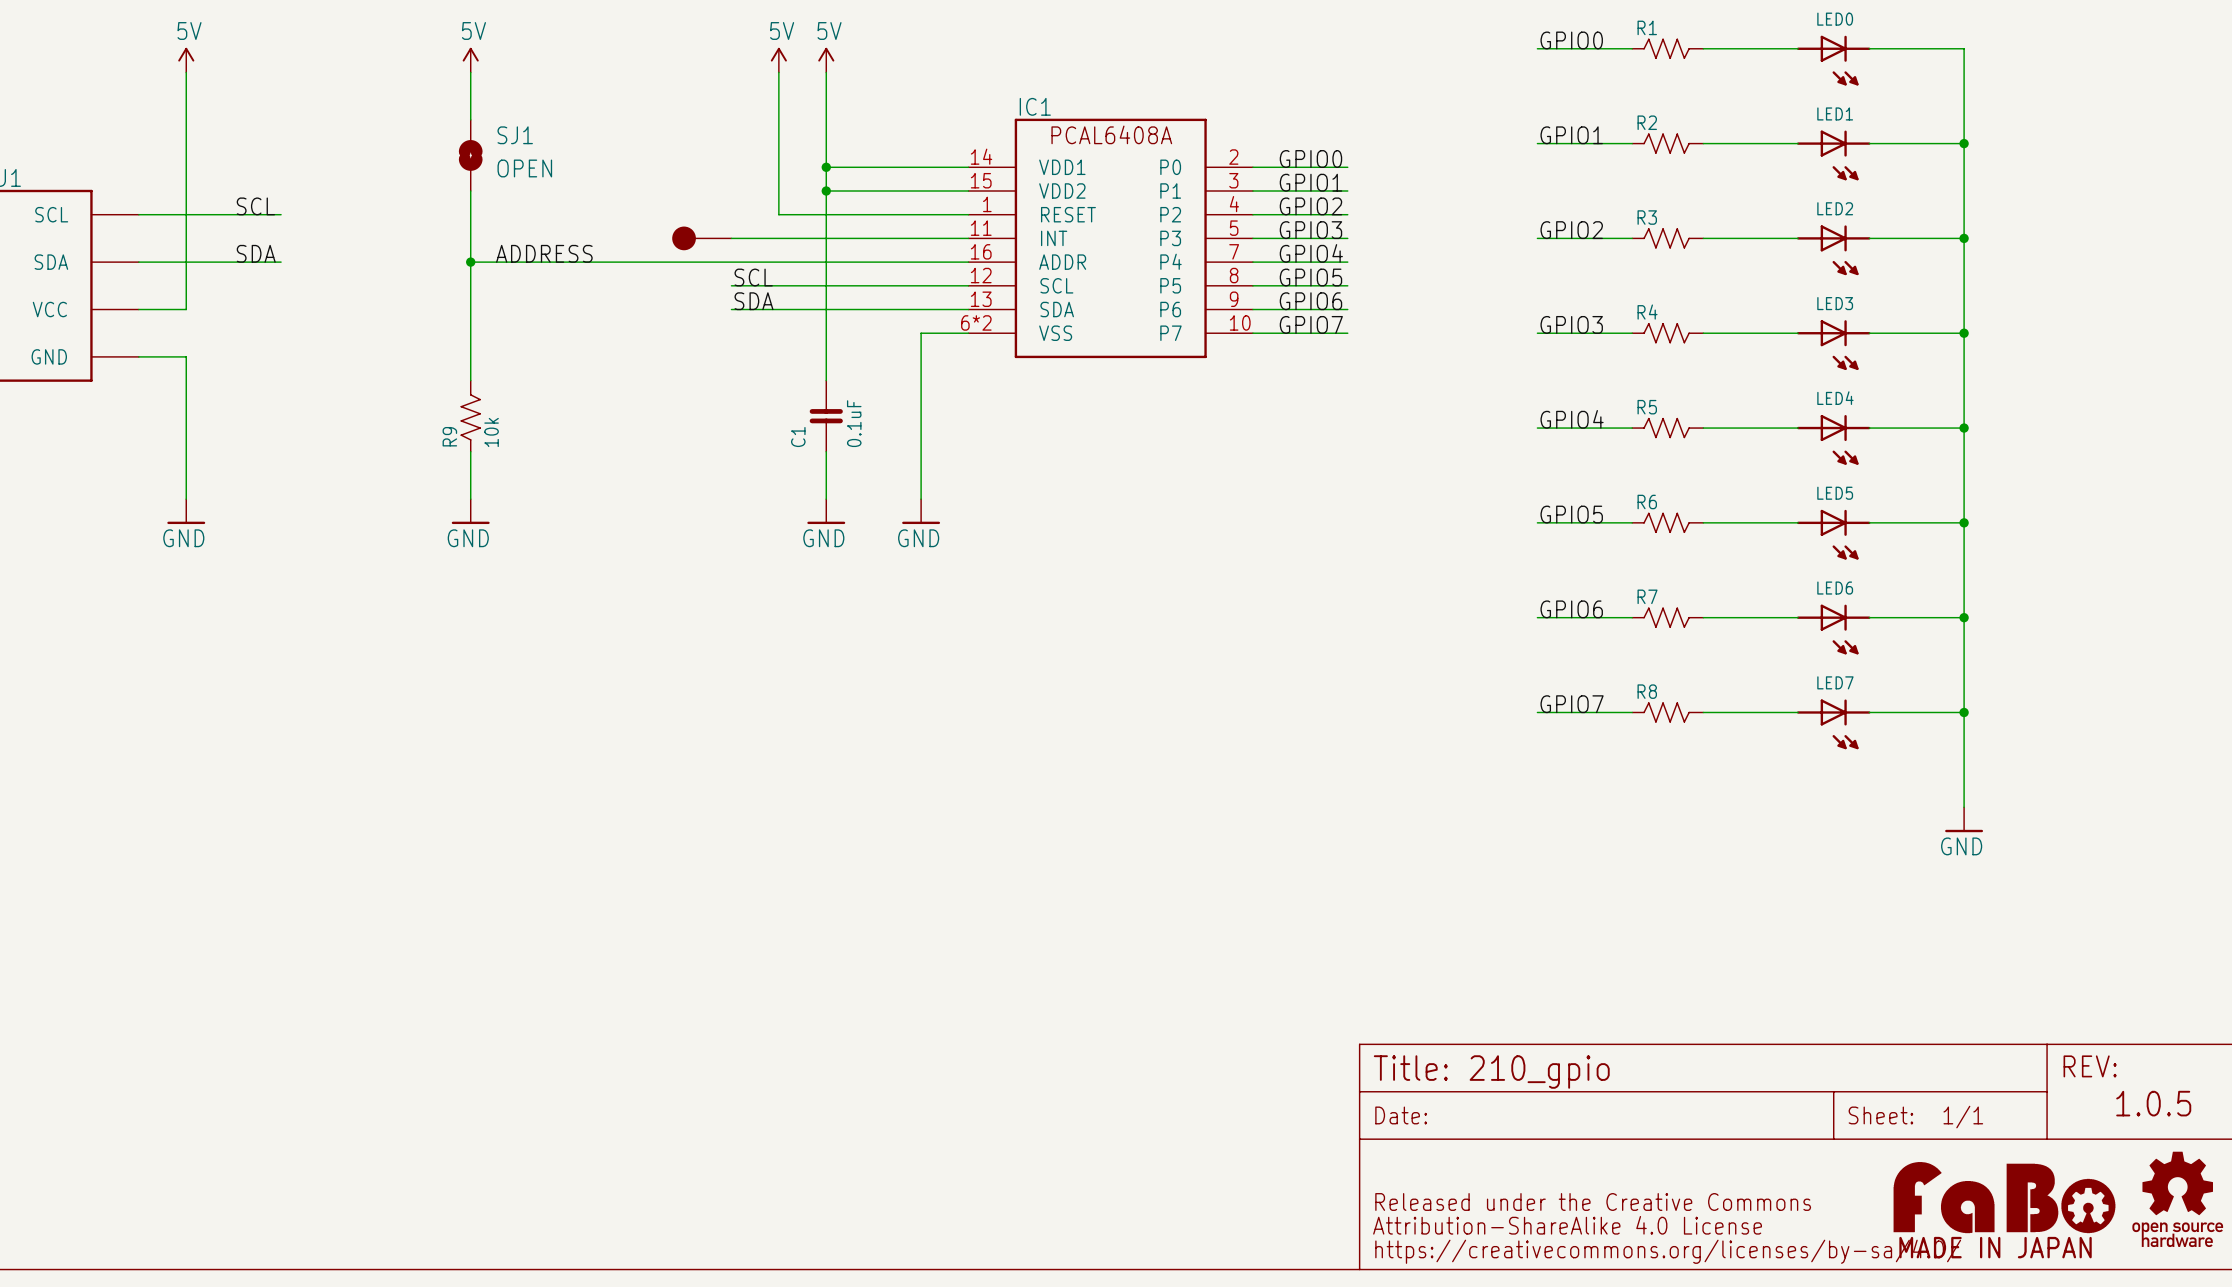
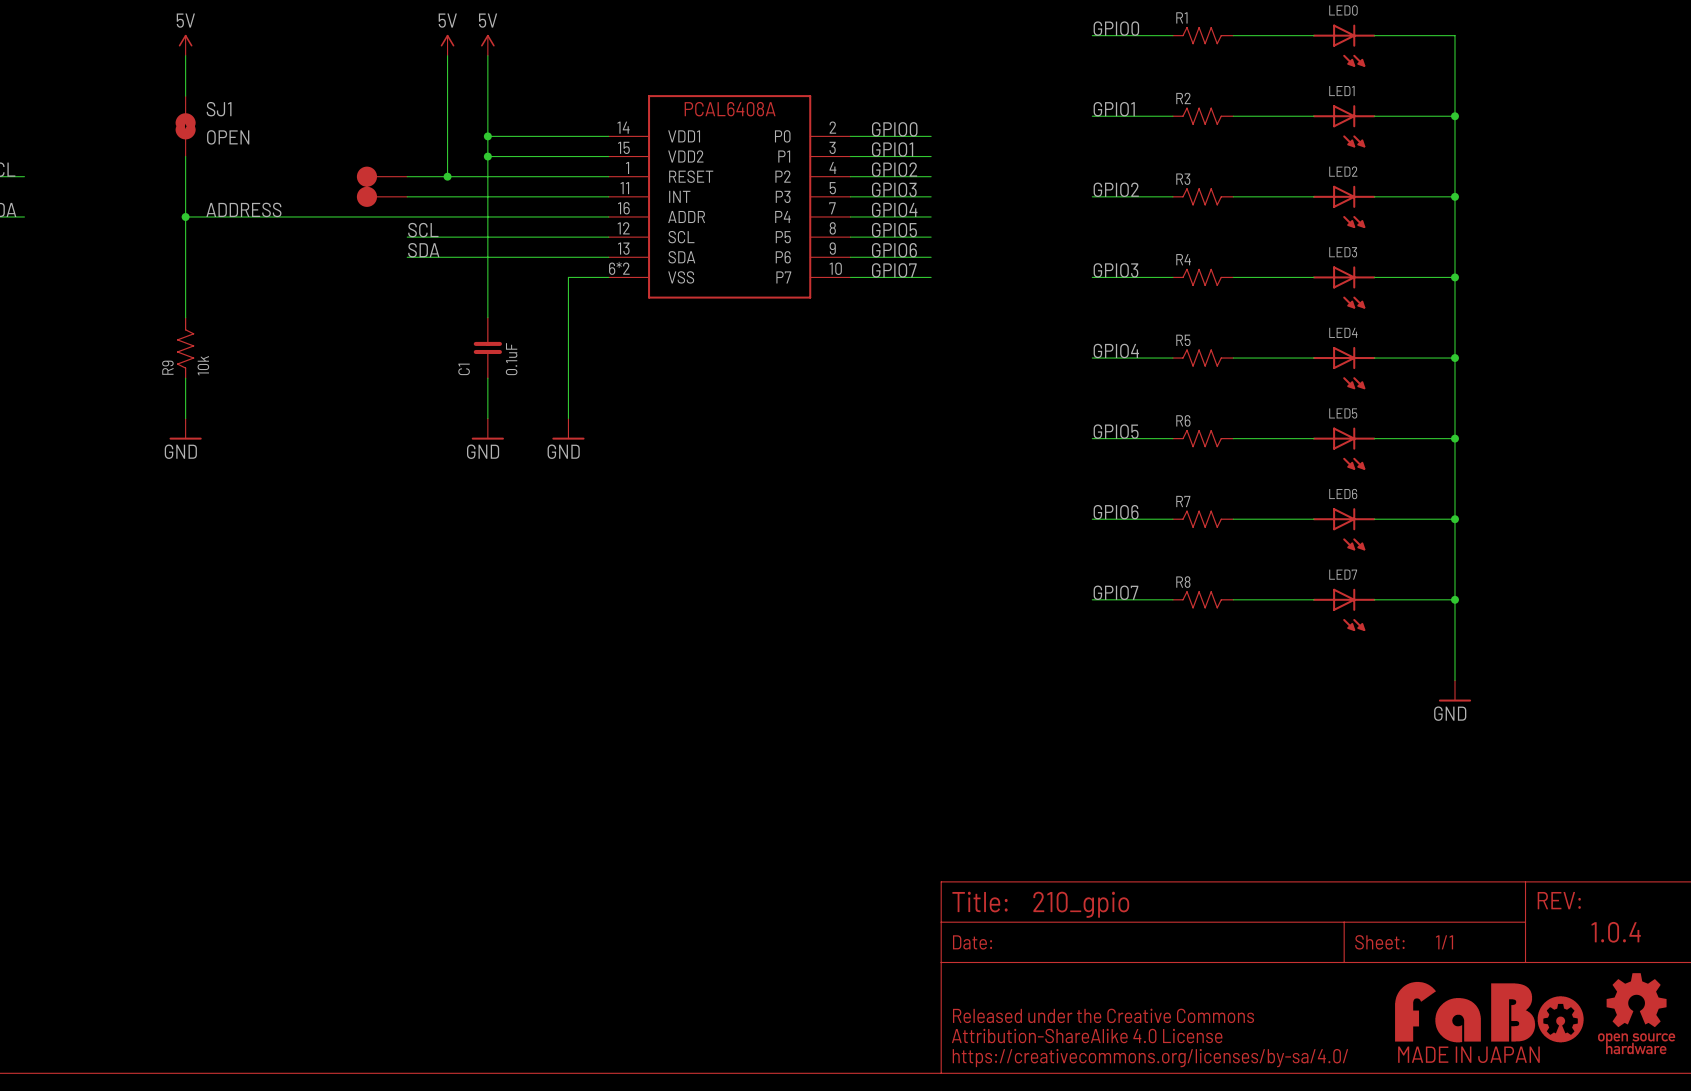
IC1 name: IC1 (1035, 106) -> none
part: none -> (382, 176)
wire: none -> (407, 176) (447, 176)
junction: none -> (447, 176)
text: 1.0.5 (2153, 1103) -> 1.0.4 (1616, 932)

